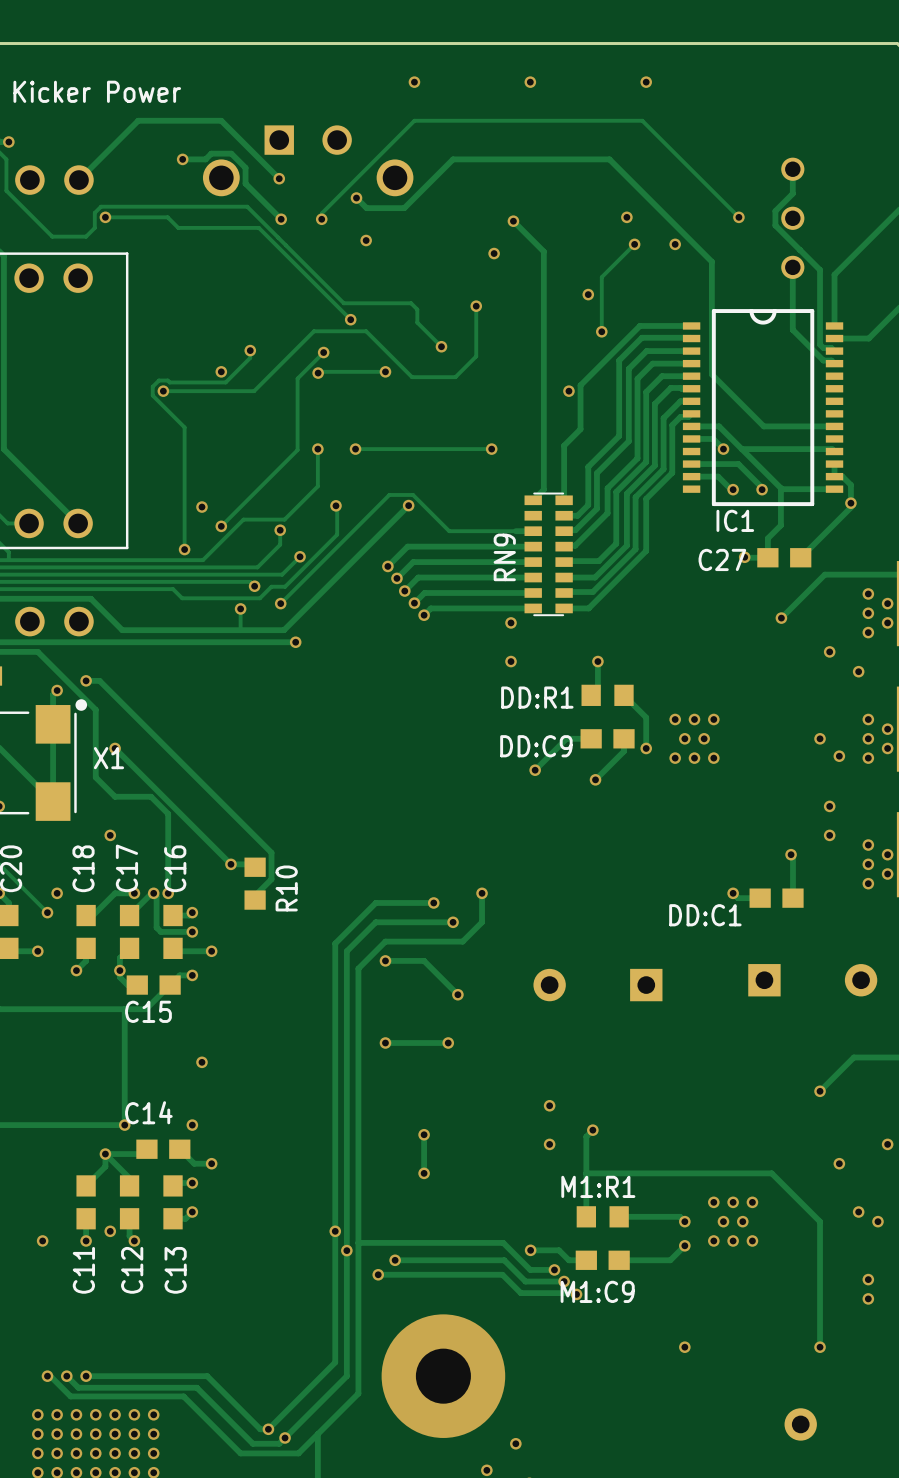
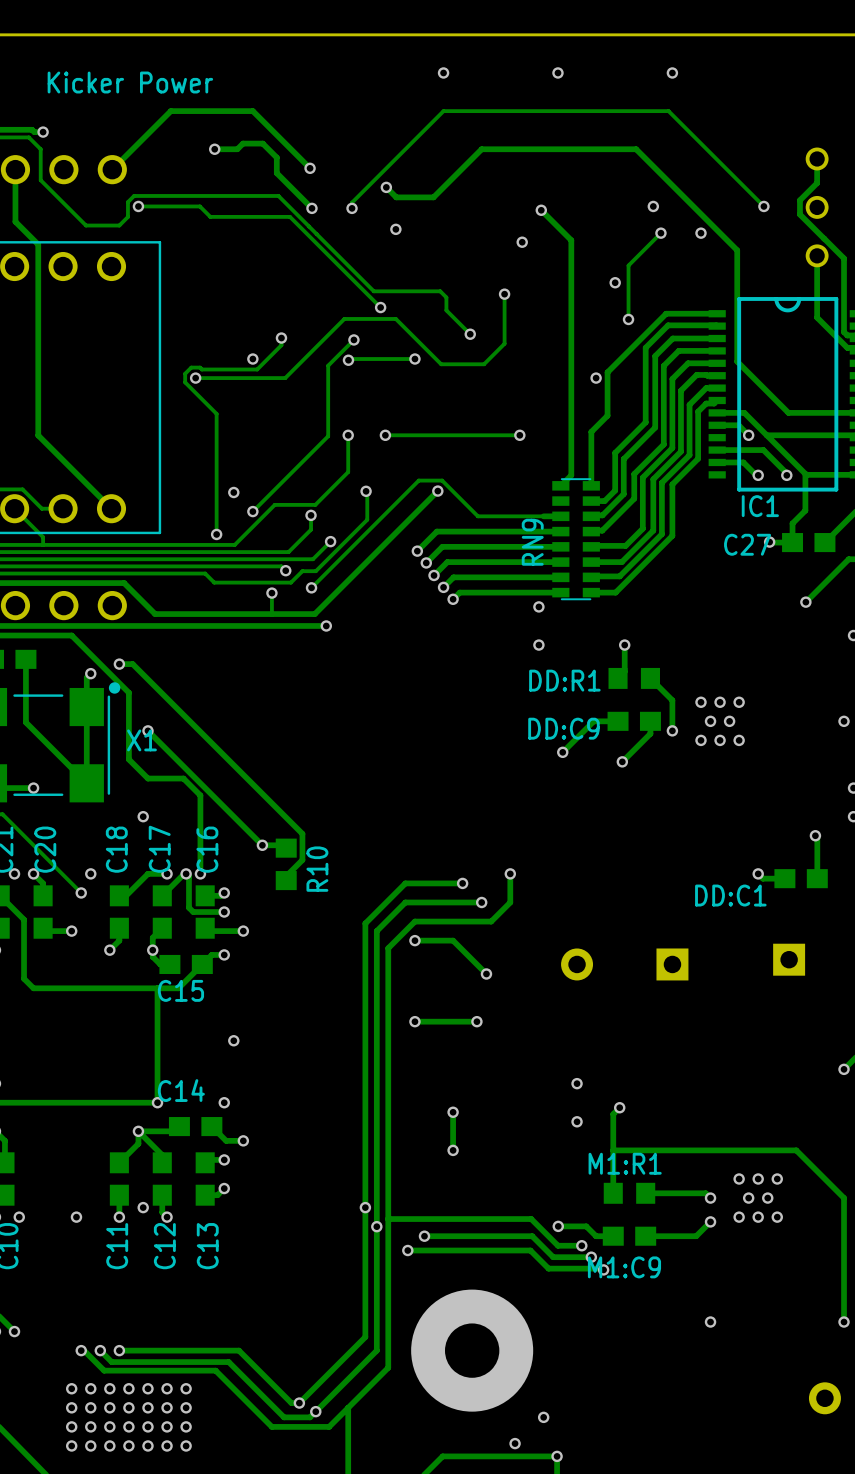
part: (308, 160) -> none

